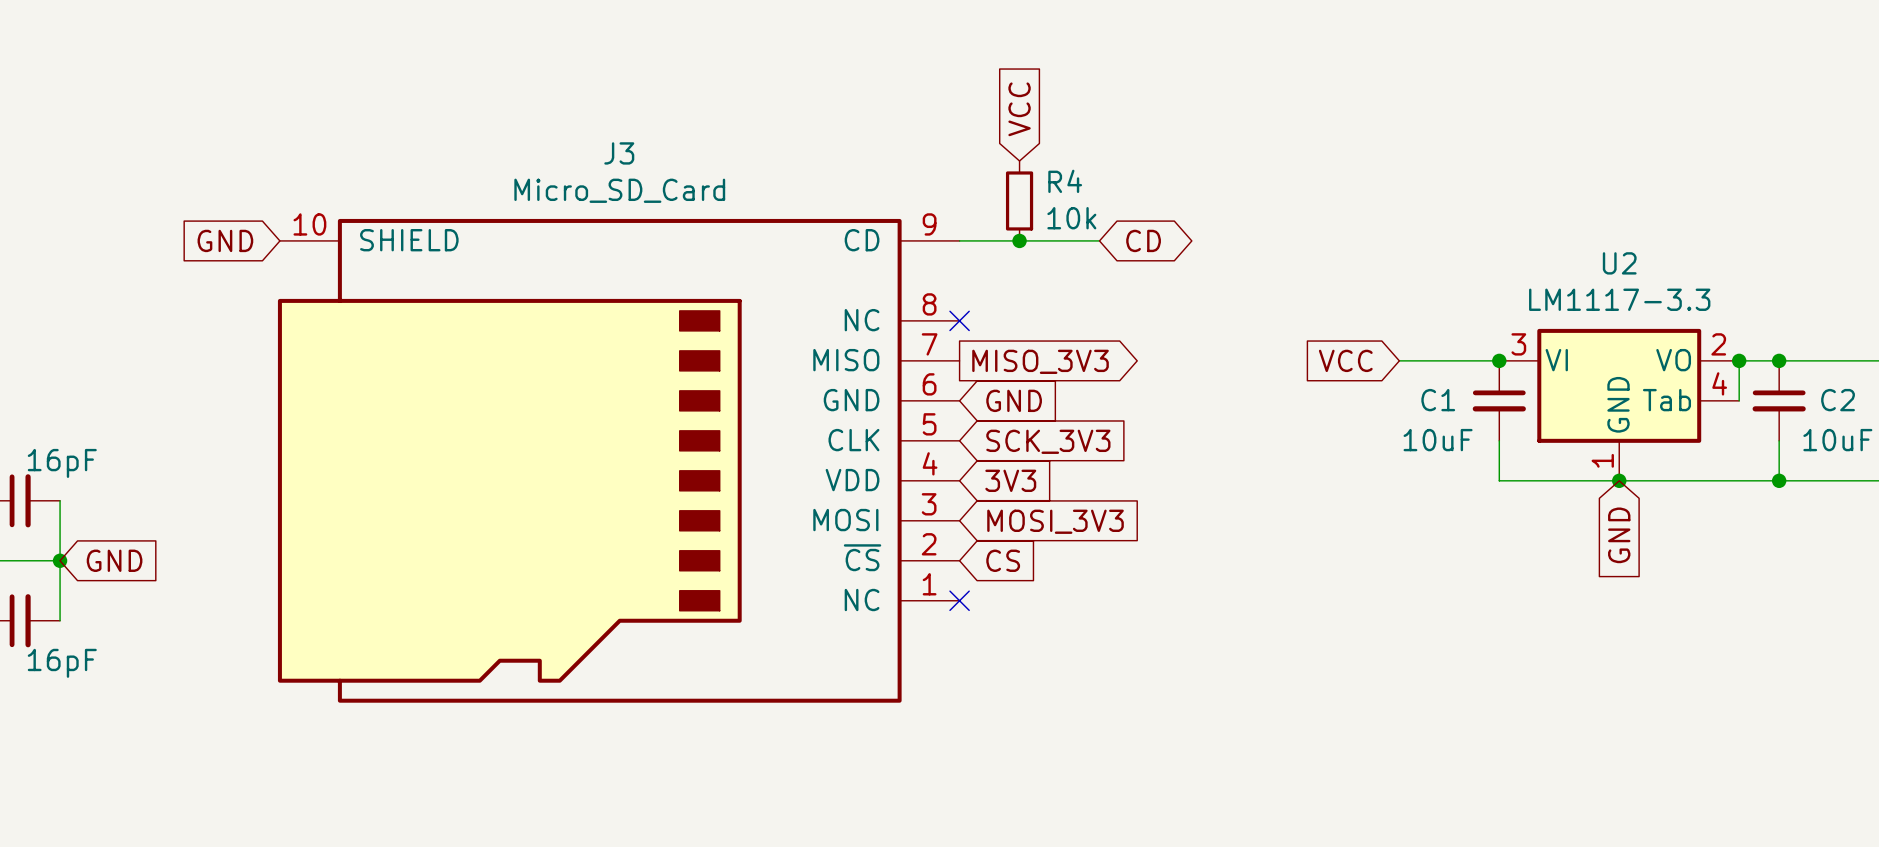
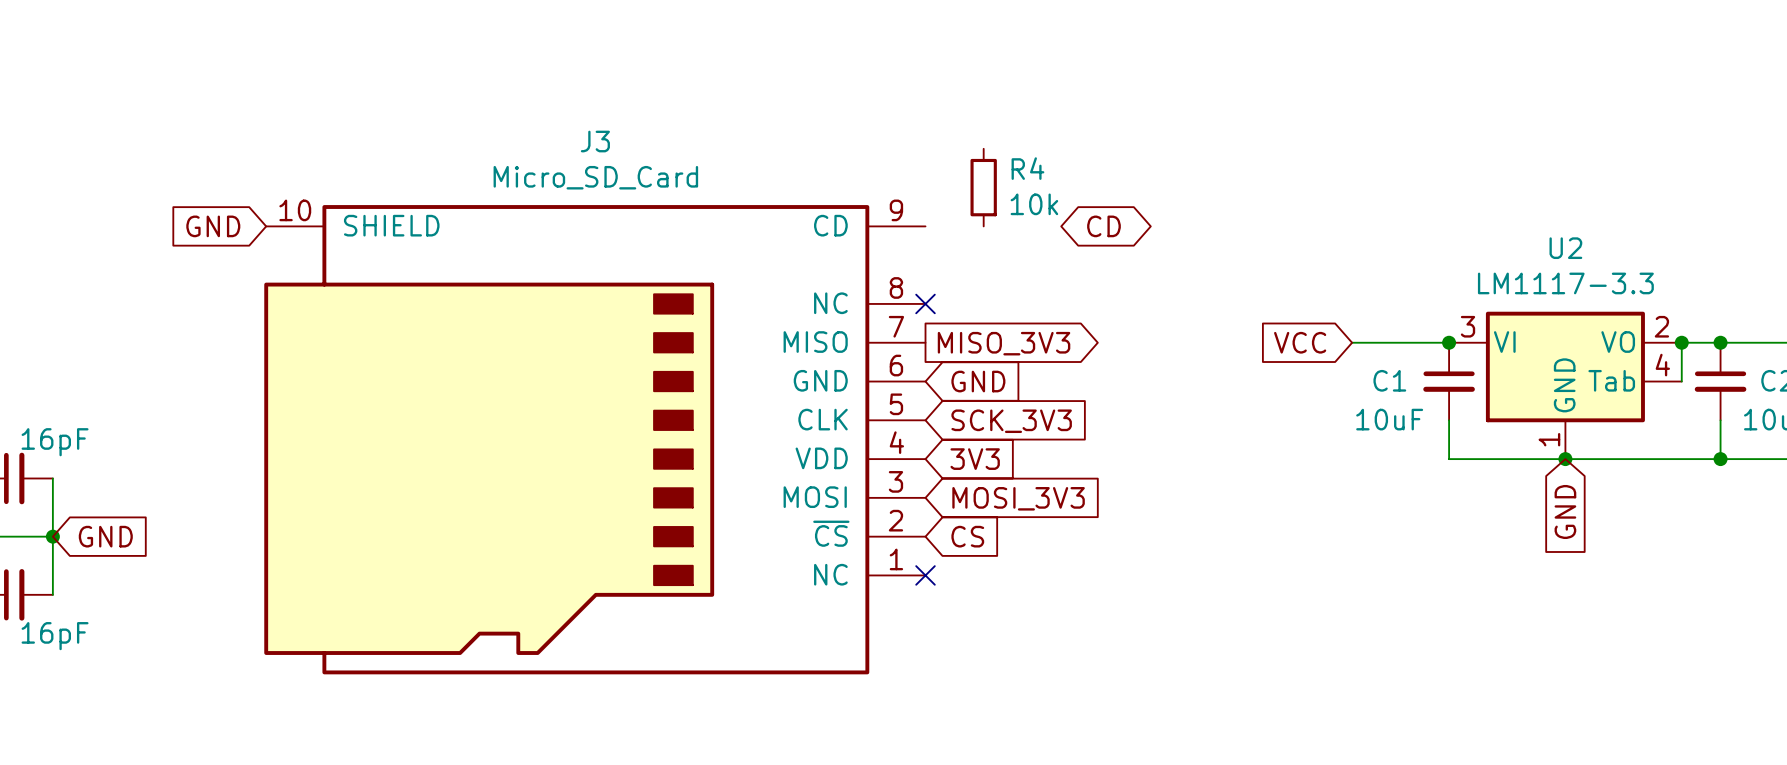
global label: VCC (1019, 109) -> none
wire: (959, 240) (1099, 240) -> none
junction: (1019, 240) -> none

